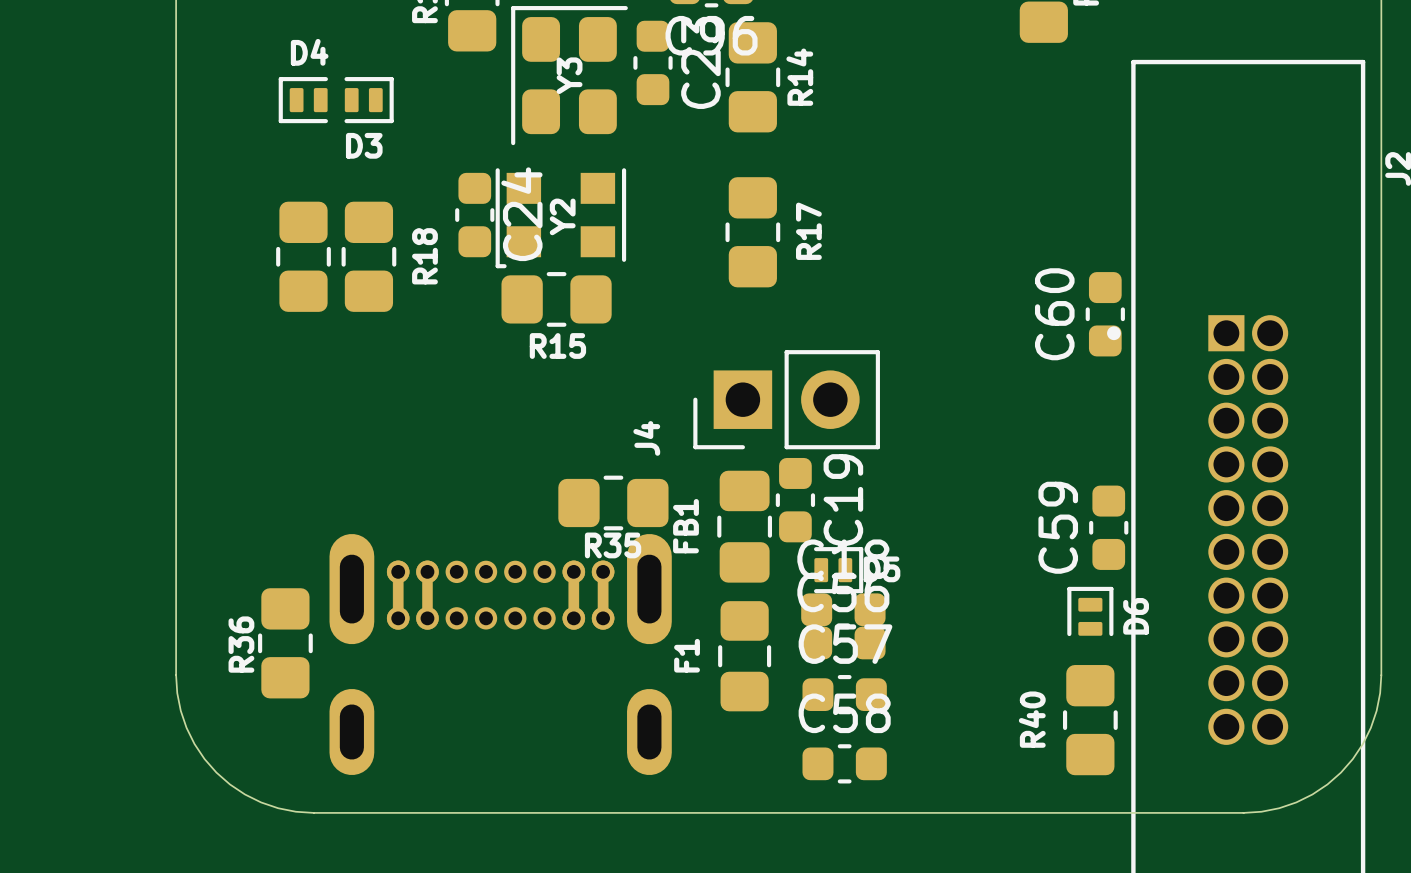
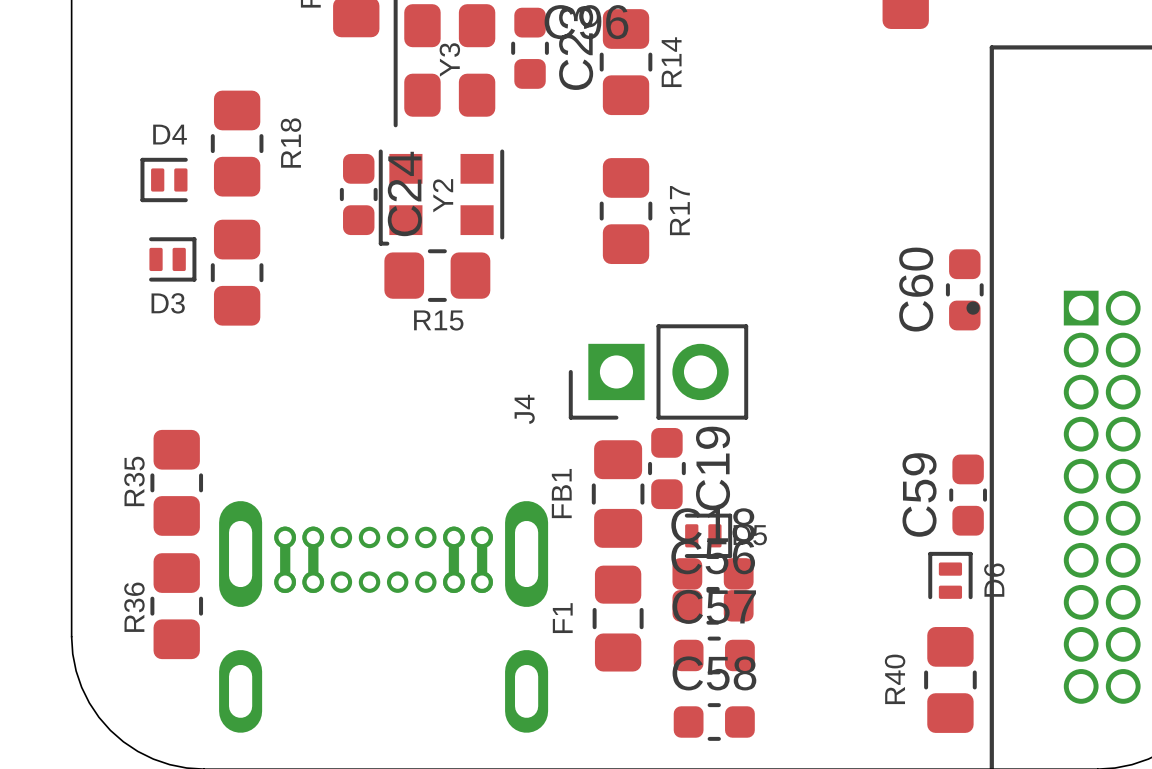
D4 position: (303, 100) -> (164, 179)
D3 position: (369, 100) -> (172, 259)
part position: (303, 256) -> (237, 272)
R18 position: (368, 256) -> (237, 143)
R35 rotation: 0° (613, 503) -> 90° clockwise (176, 482)
R35 position: (613, 503) -> (176, 482)

